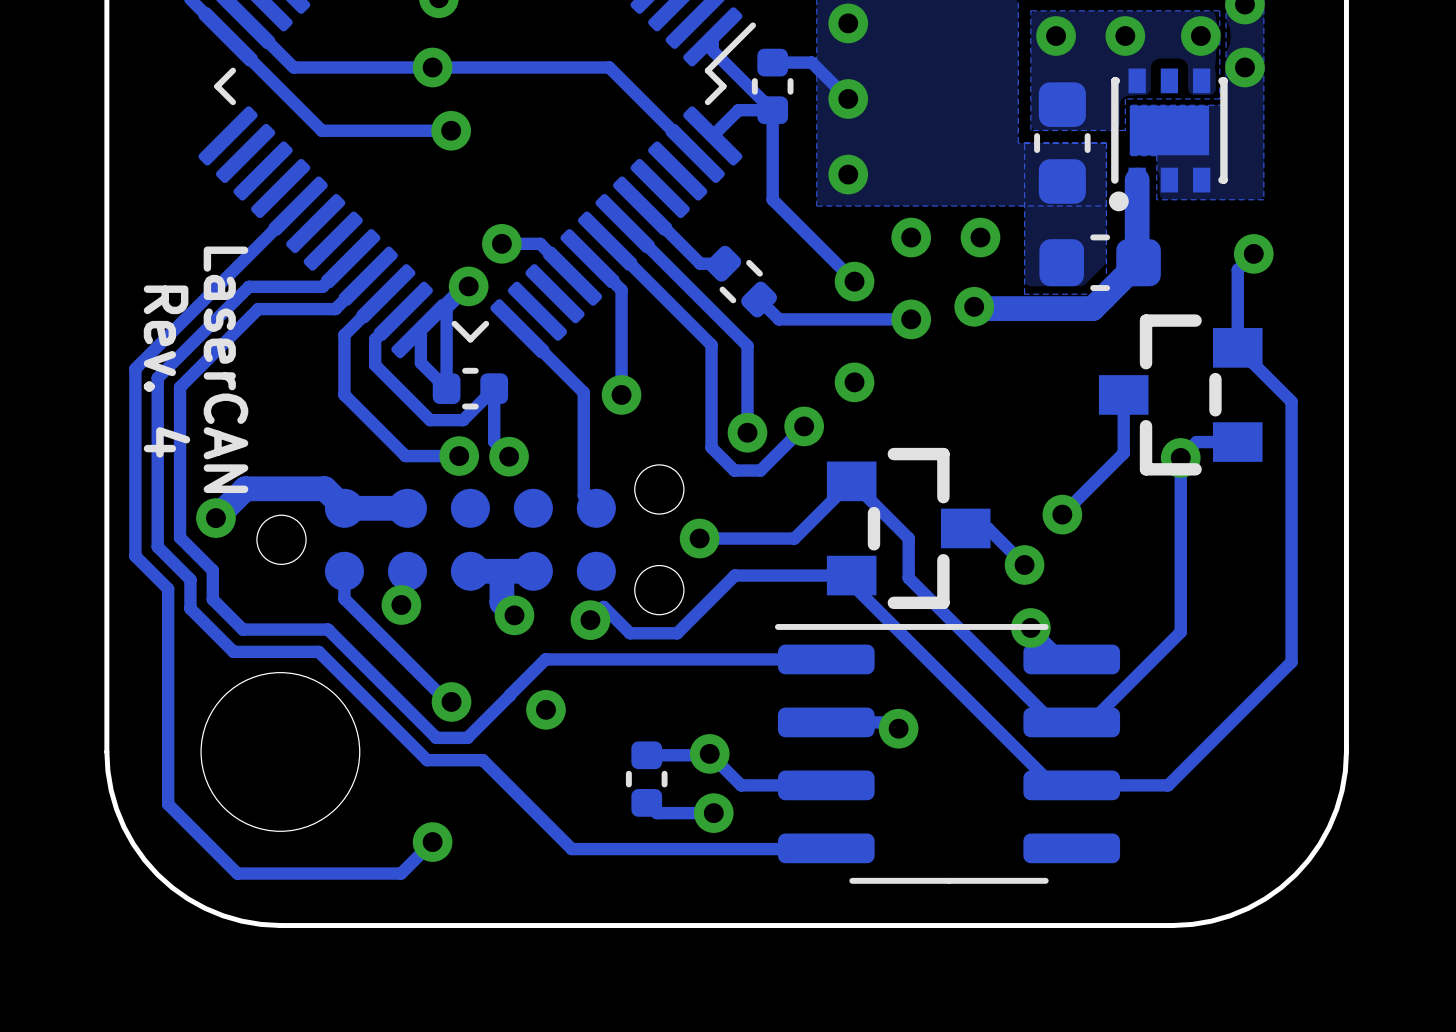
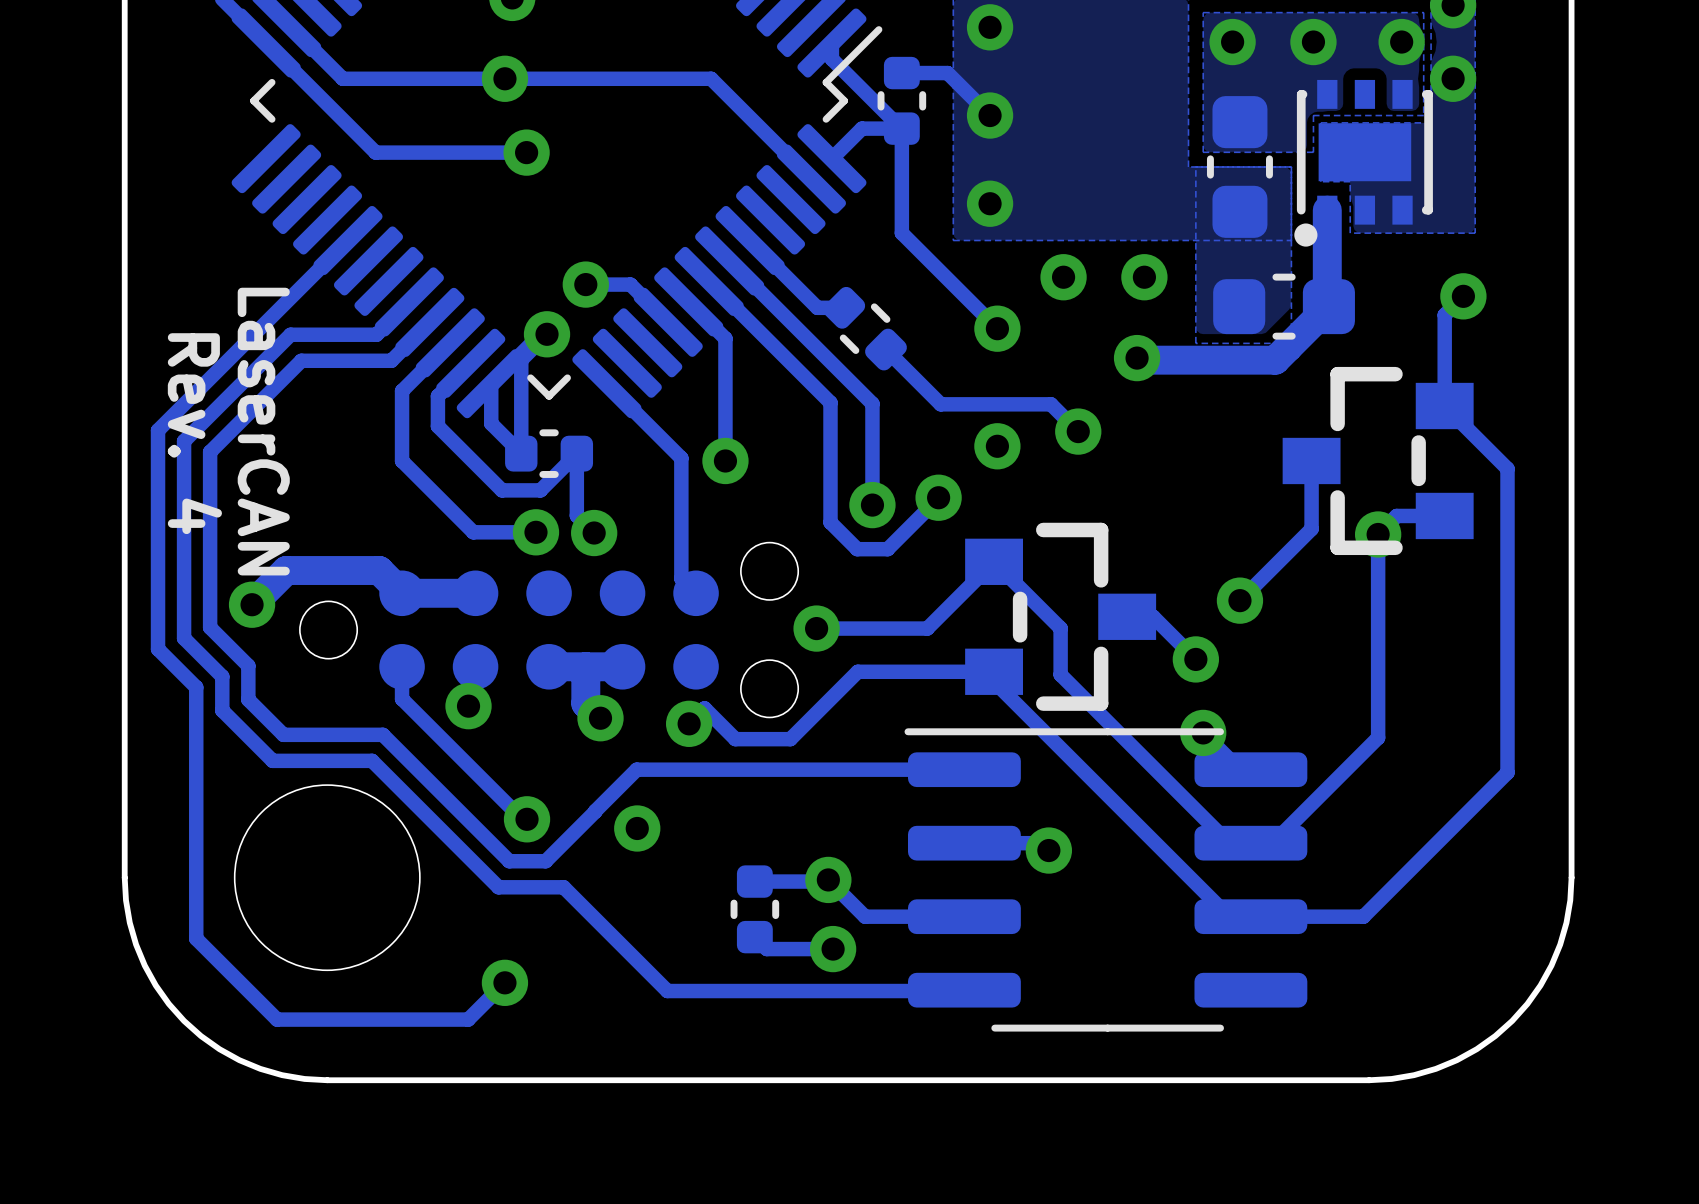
track: (911, 319) (778, 319) -> (1078, 431) (1051, 404) (940, 404) (909, 372)
via position: (911, 319) -> (1078, 431)

